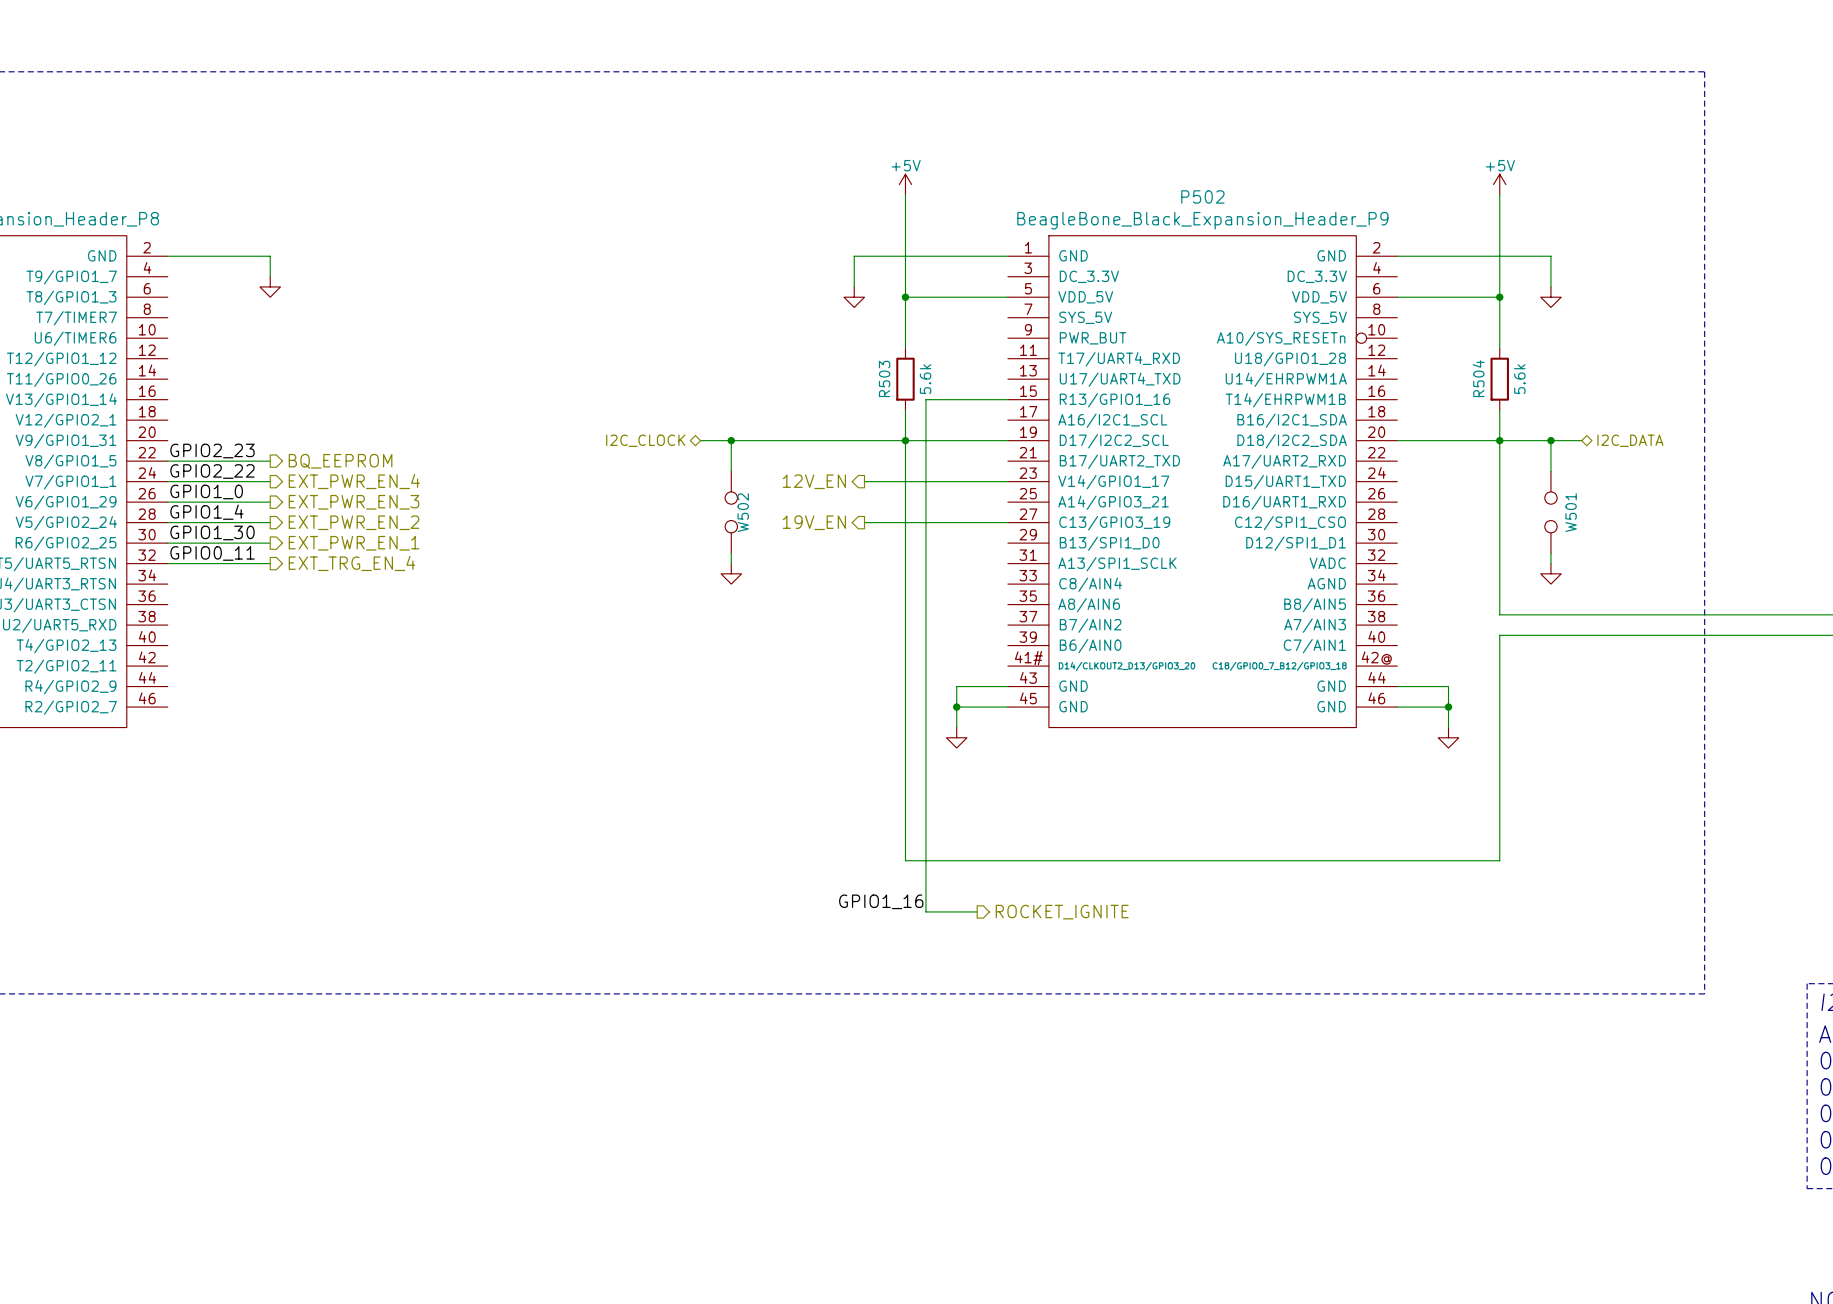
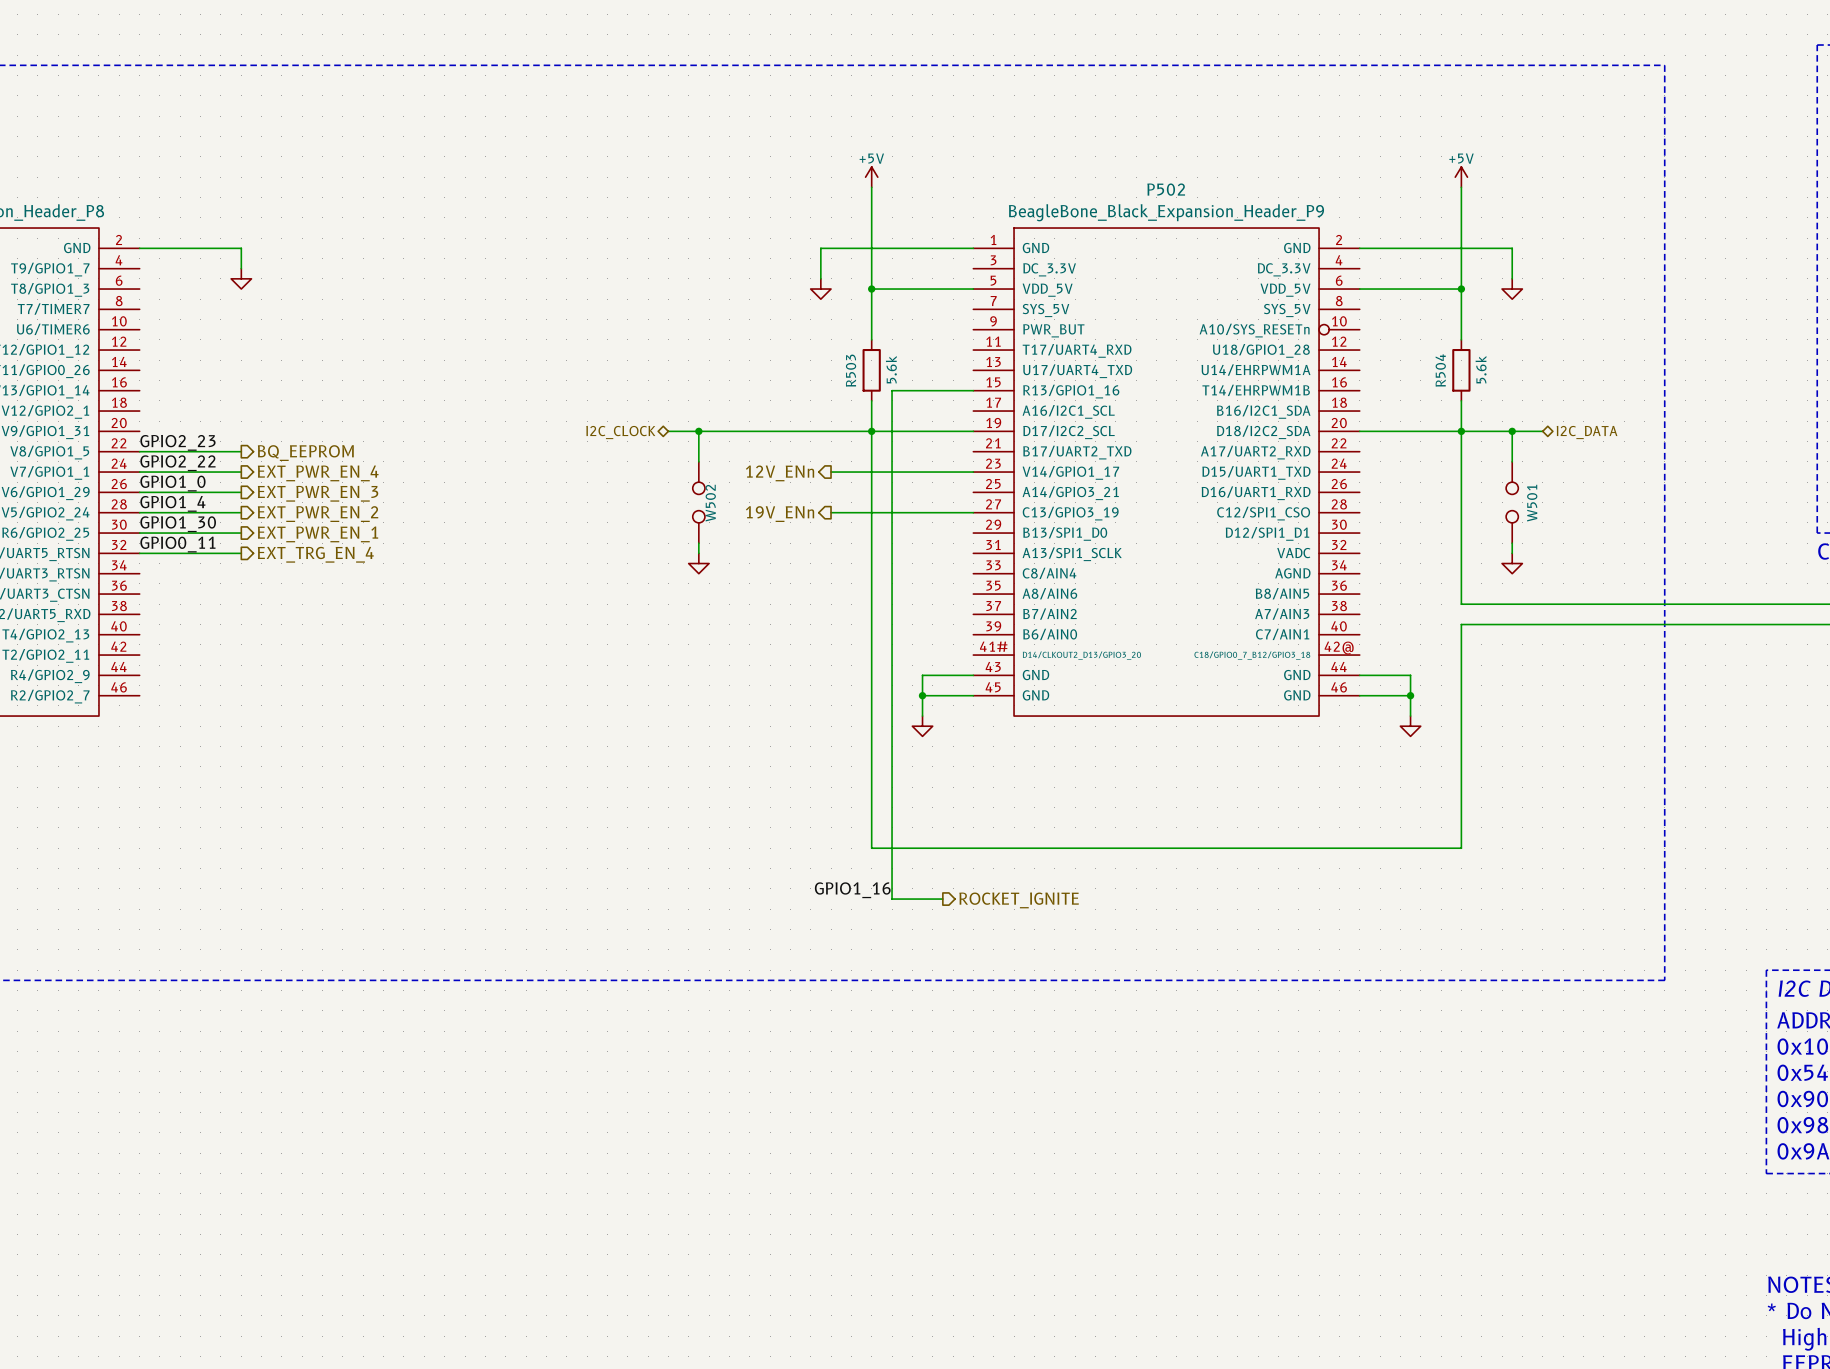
hierarchical label: 12V_EN (814, 481) -> 12V_ENn (780, 473)
hierarchical label: 19V_EN (814, 522) -> 19V_ENn (780, 514)

